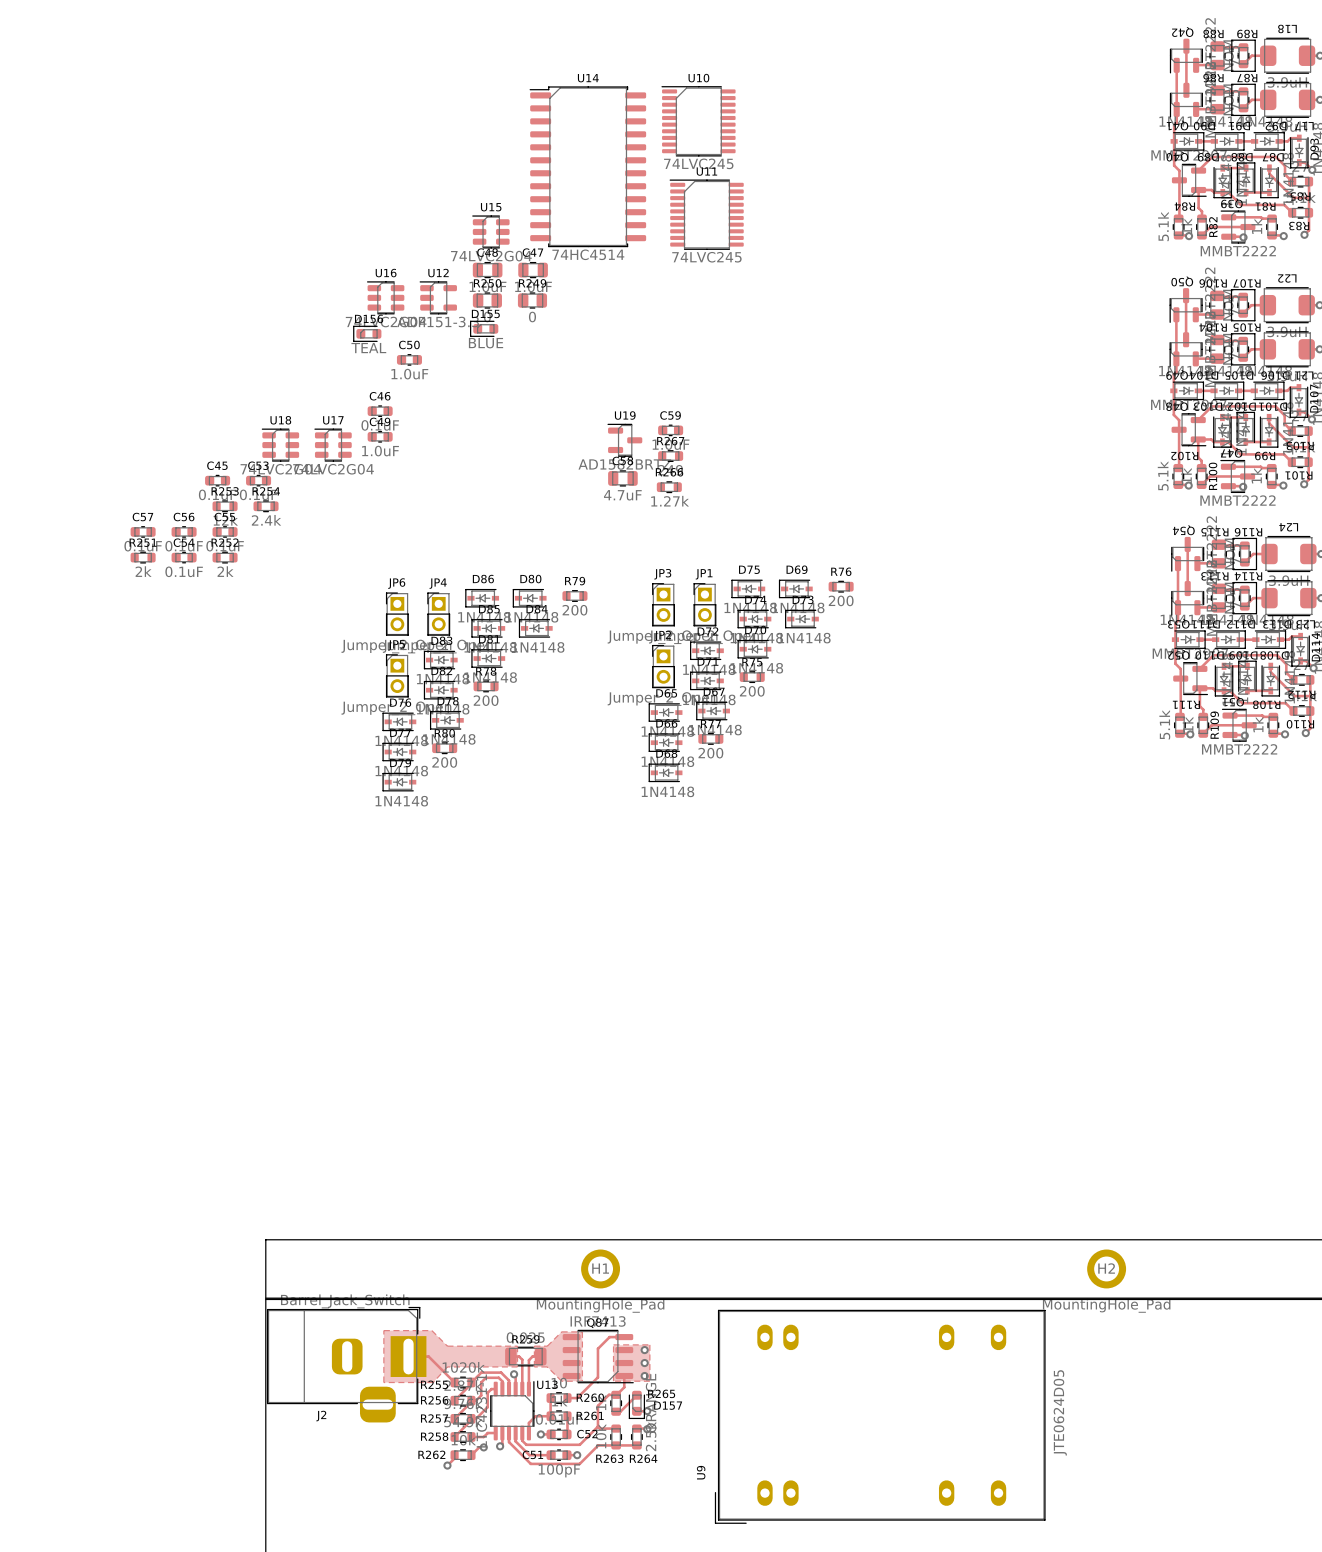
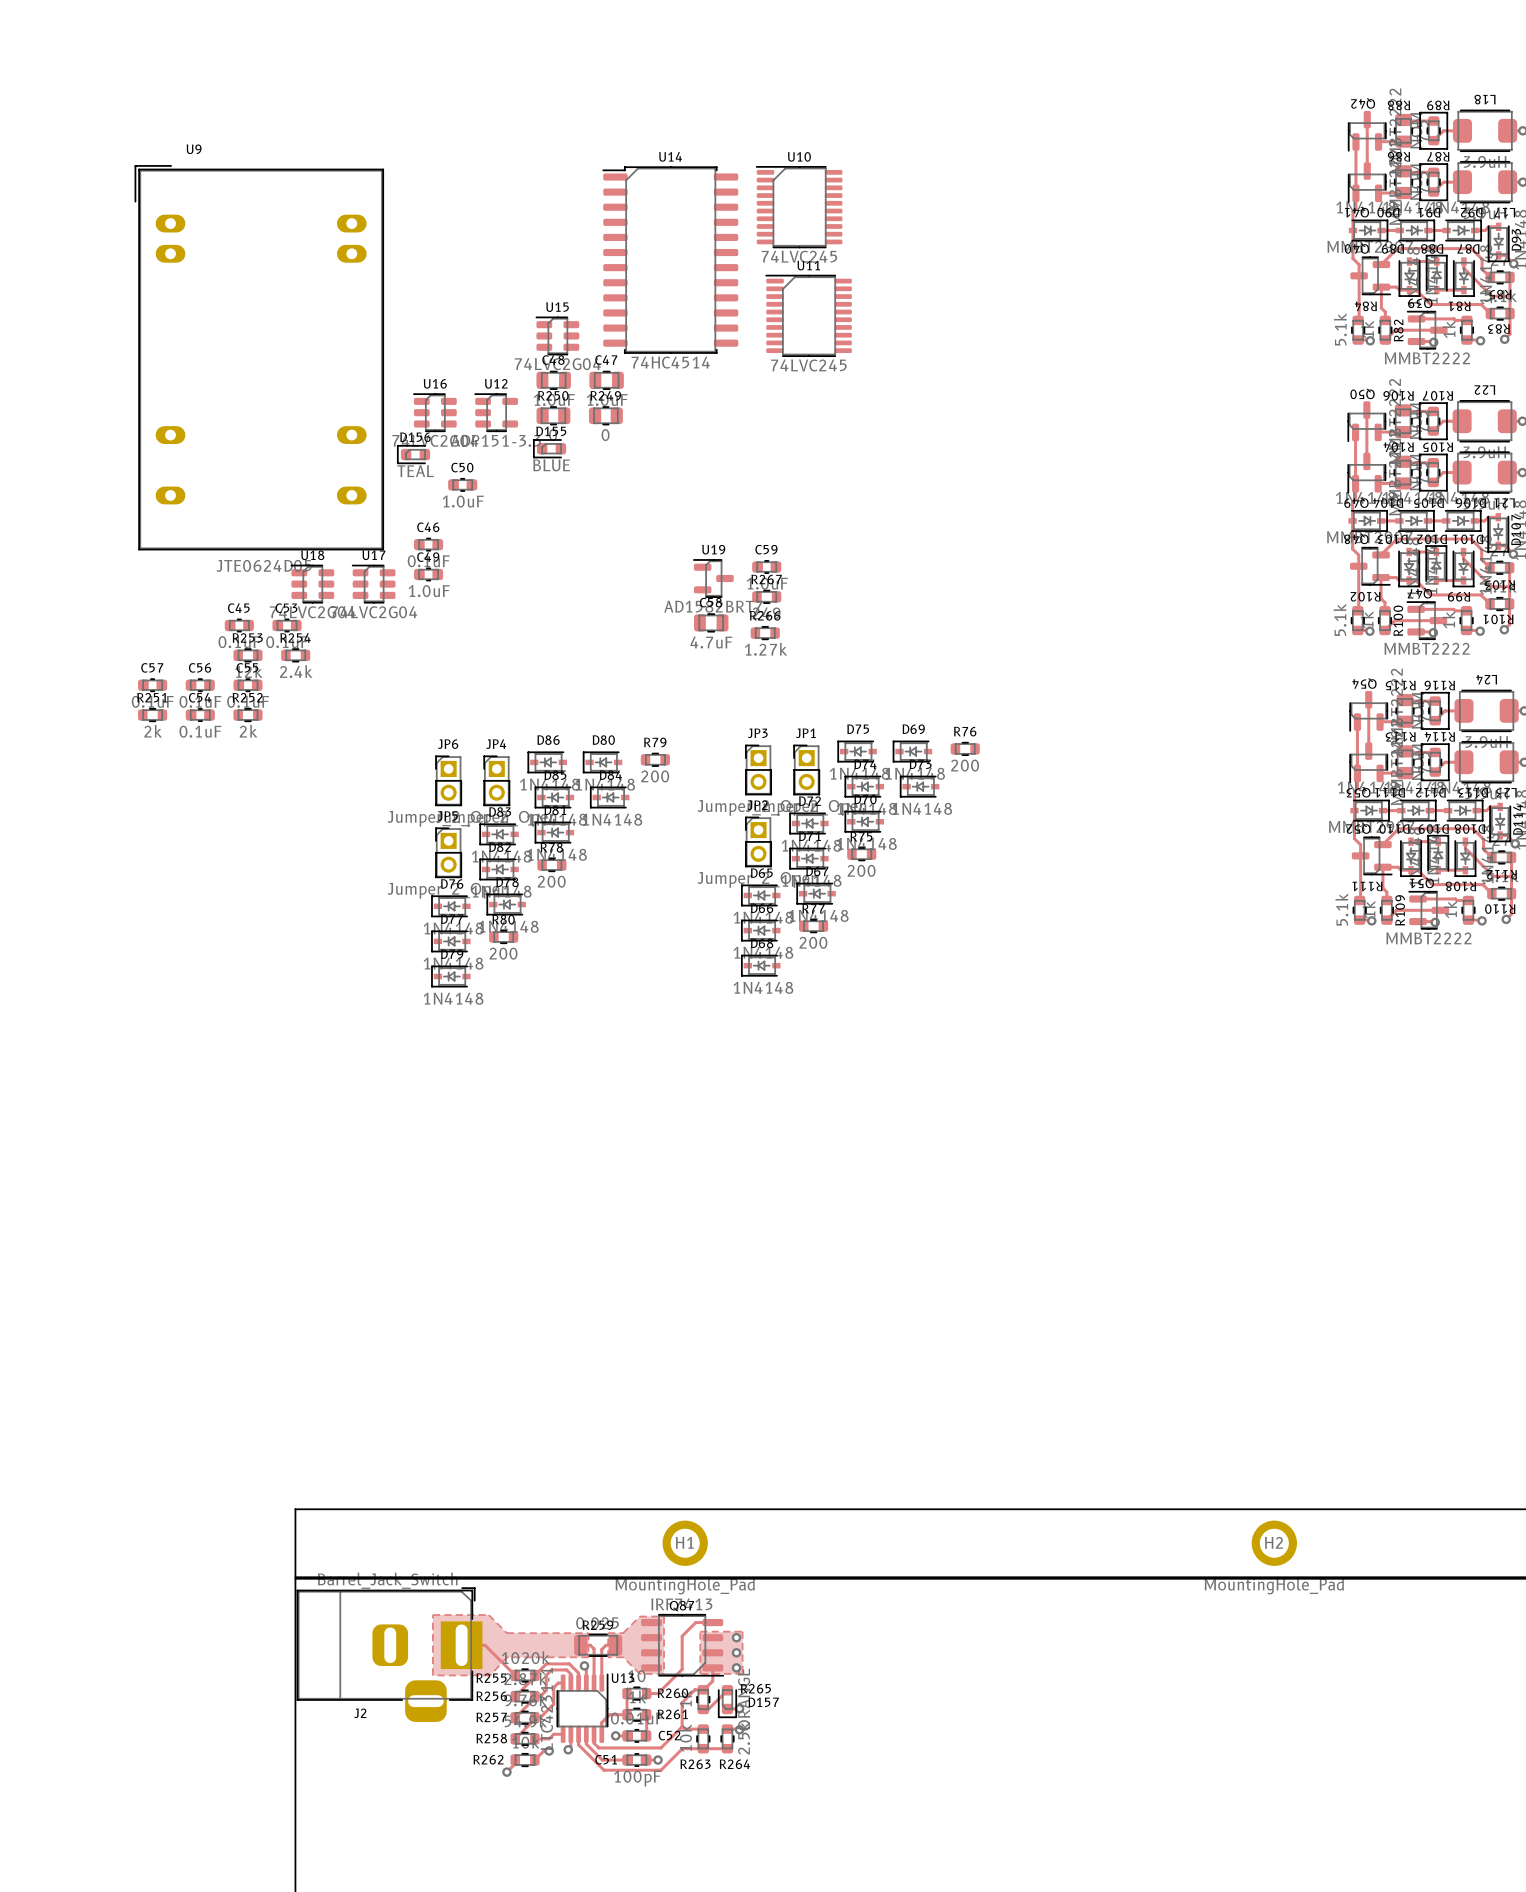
U9 rotation: 0° (880, 1416) -> 90° clockwise (259, 357)
U9 position: (880, 1416) -> (259, 357)

